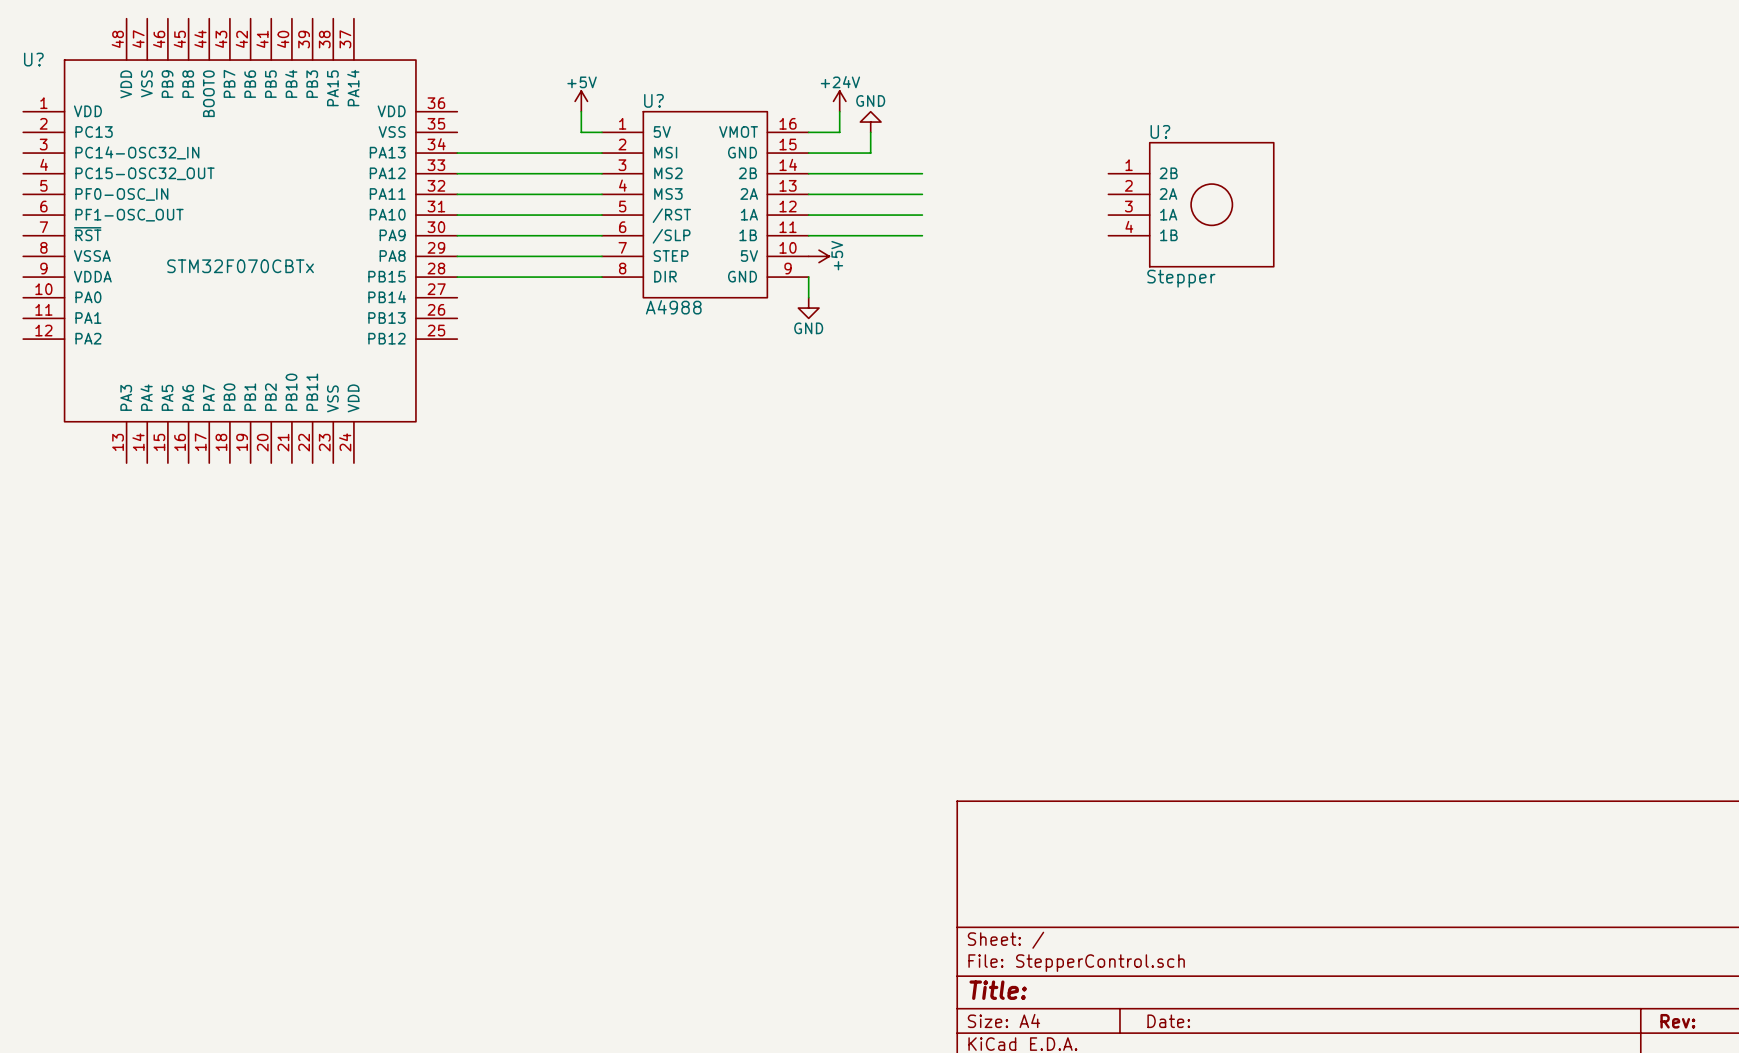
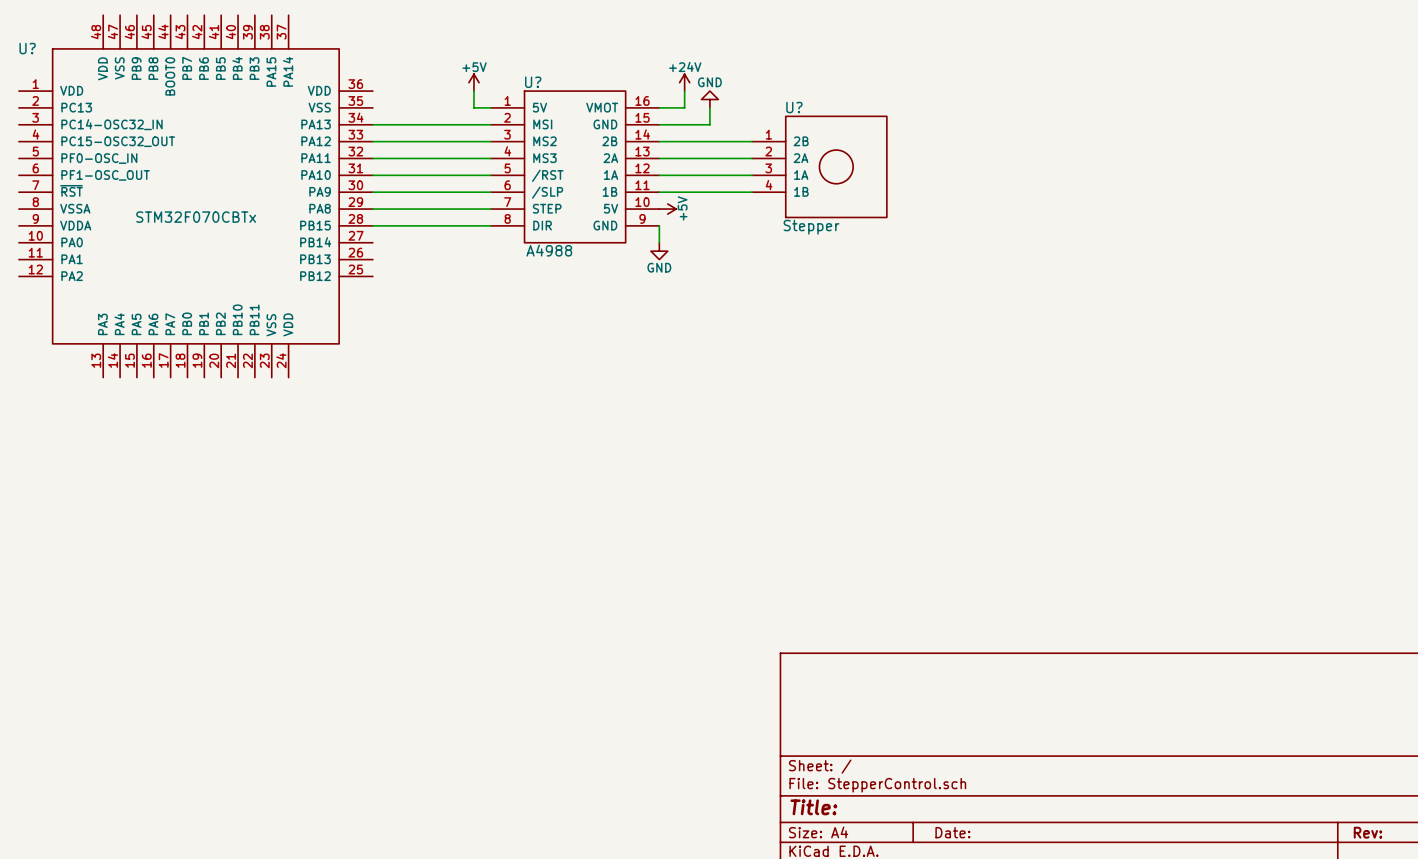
U? position: (1191, 204) -> (819, 166)

